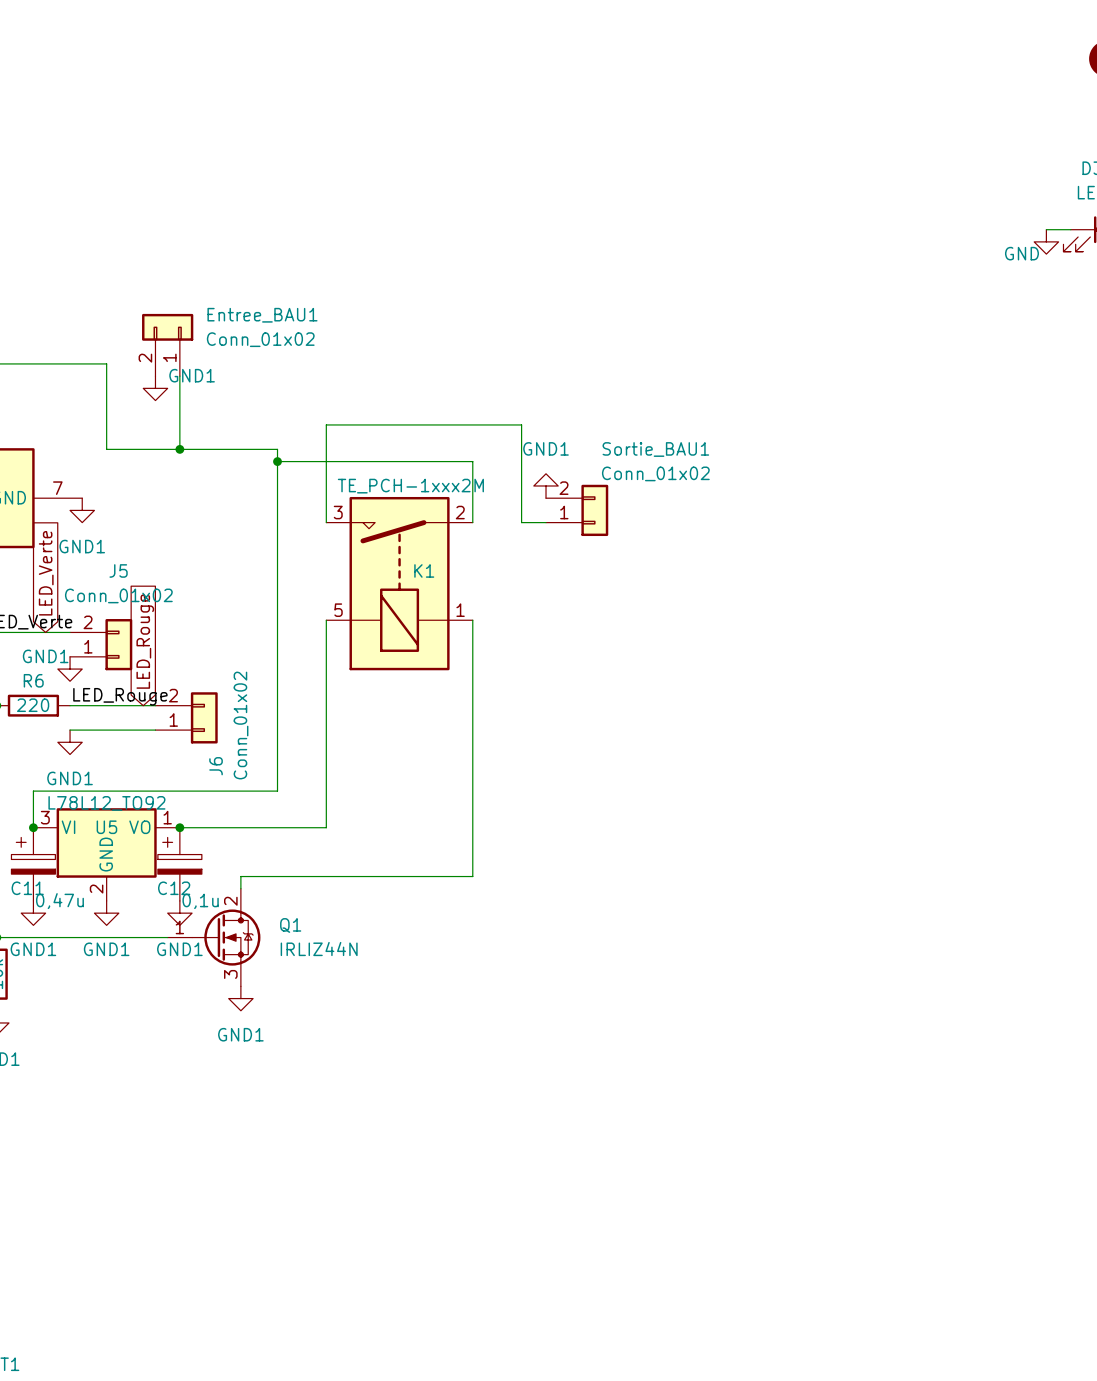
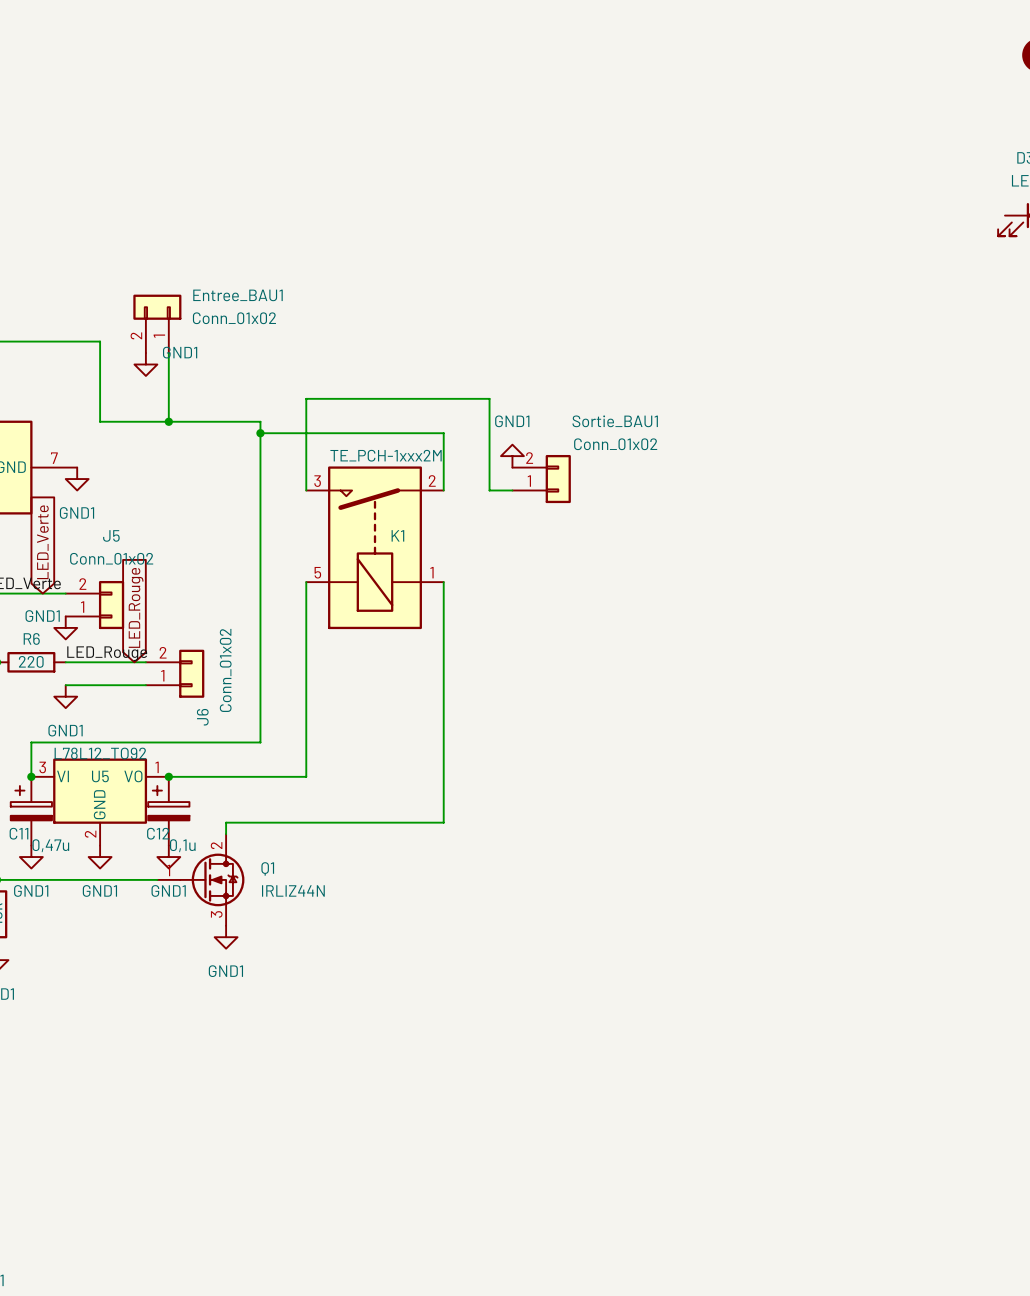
wire: (1046, 229) (1070, 229) -> none
power symbol: GND (1046, 241) -> none

